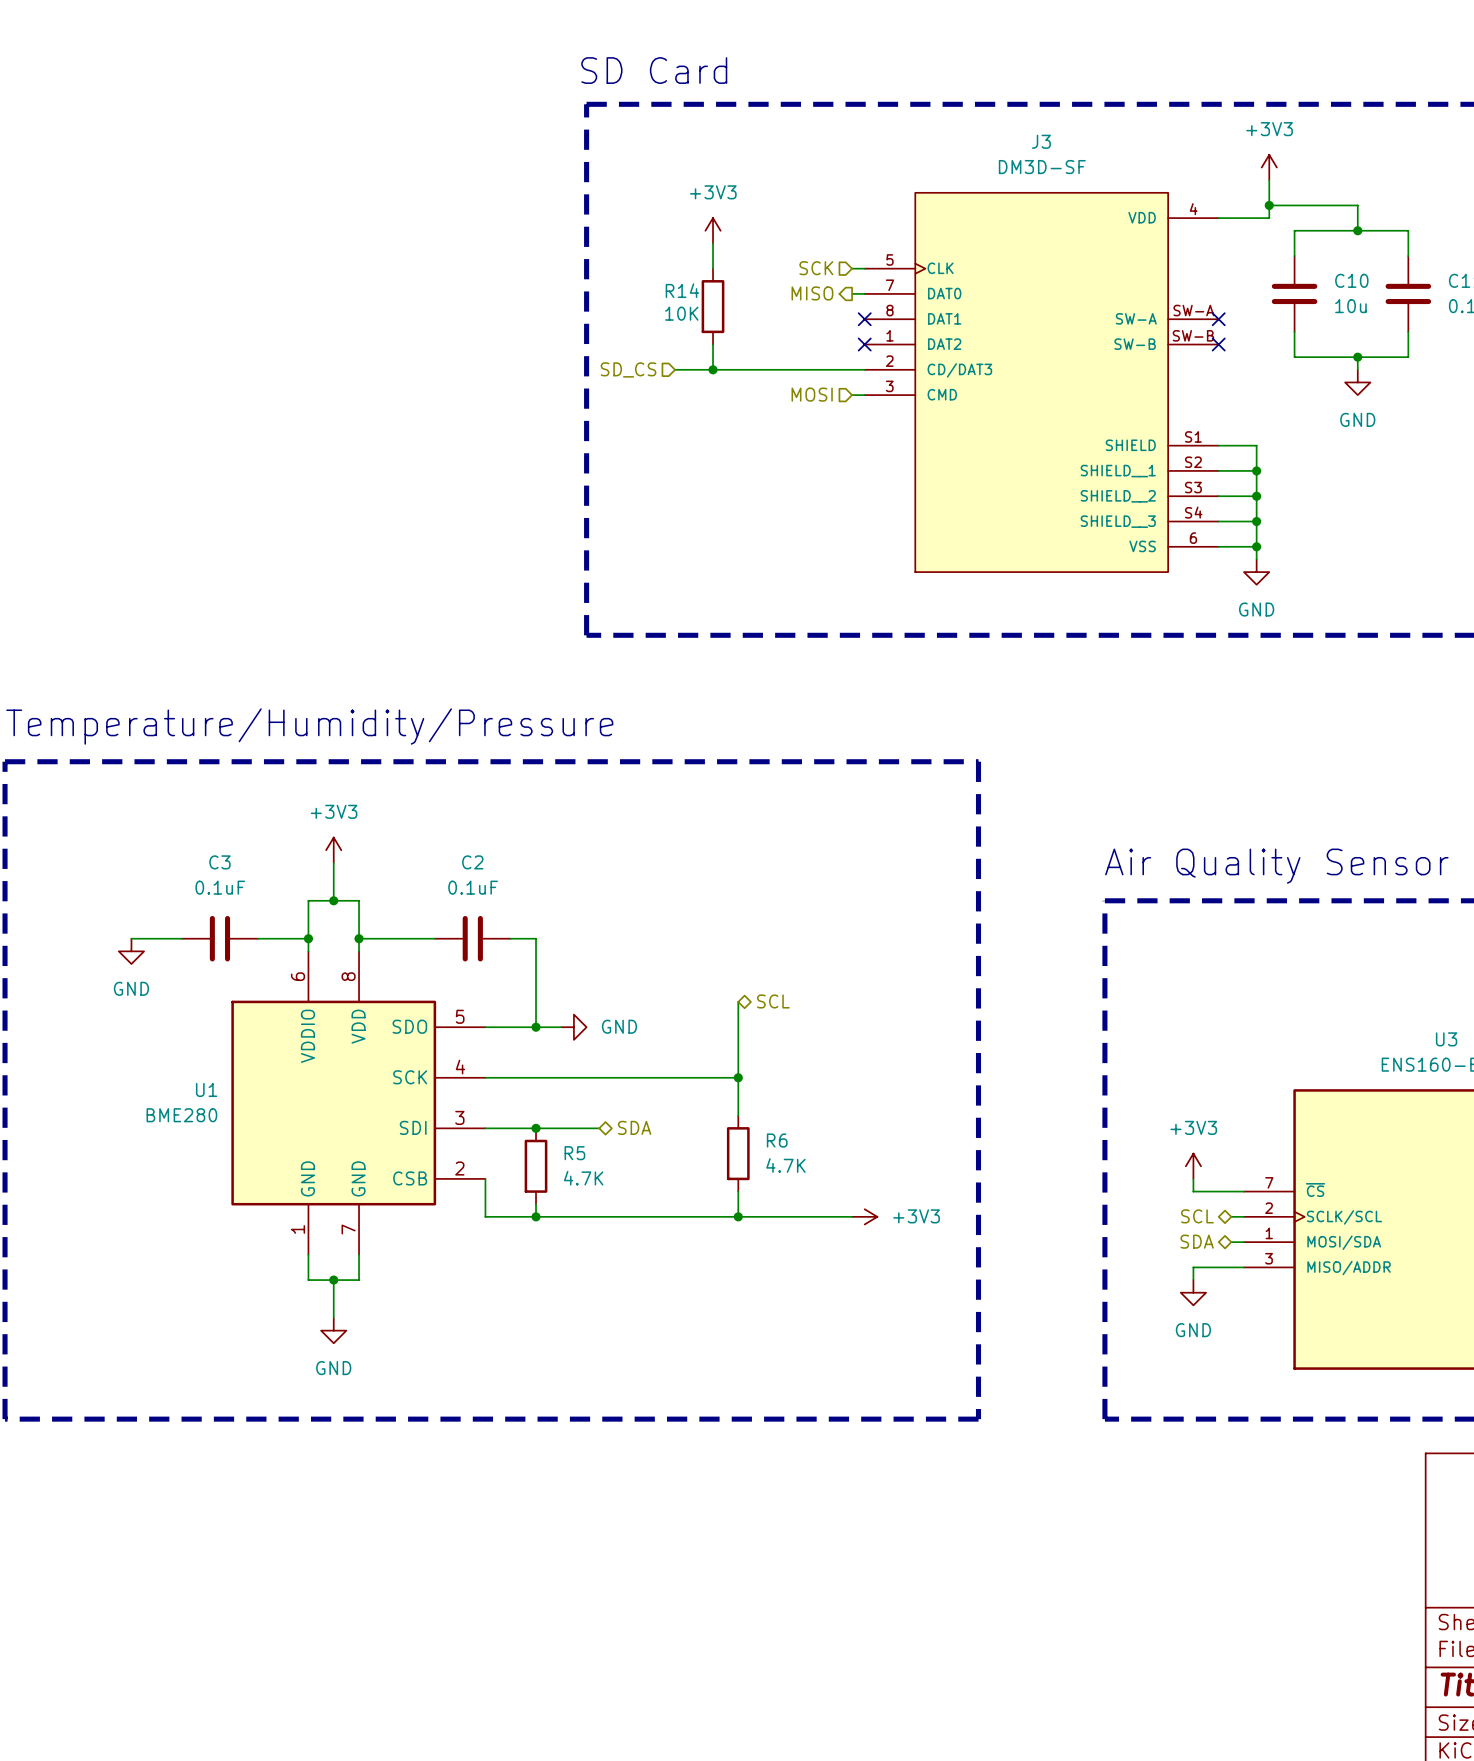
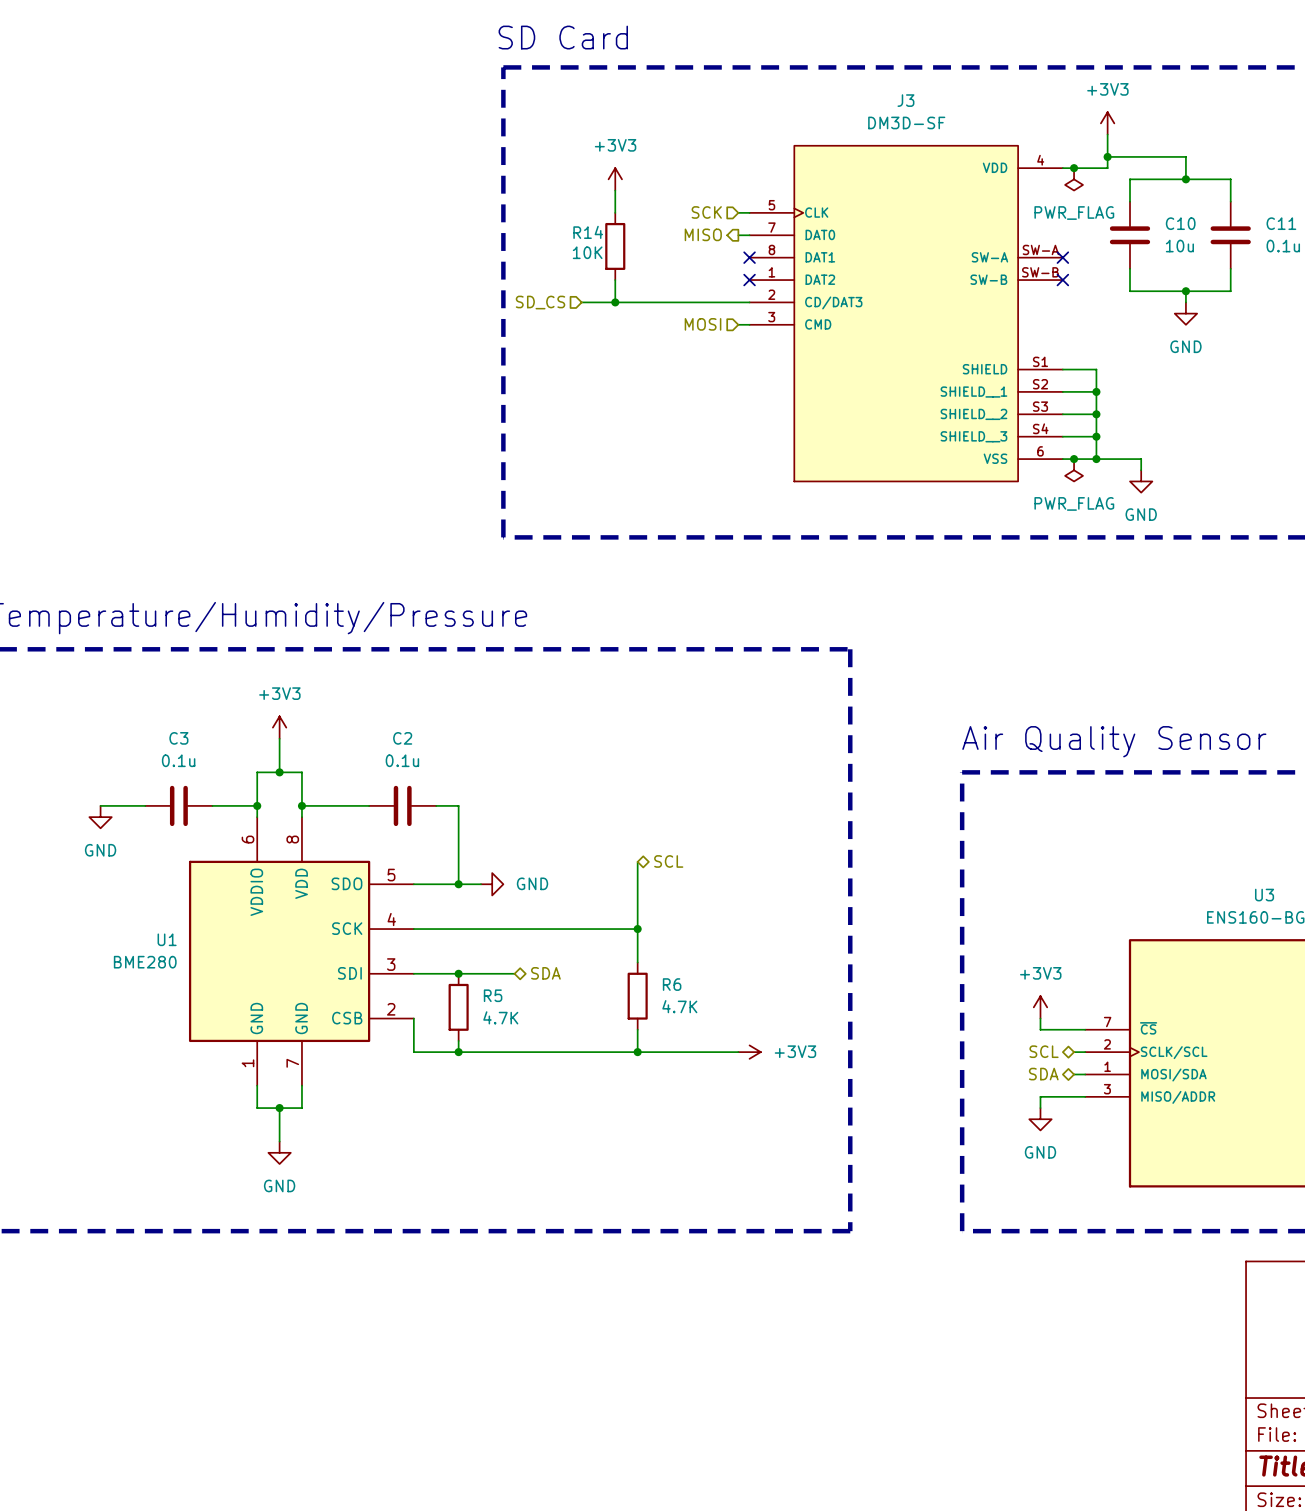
junction: none -> (1074, 168)
power symbol: none -> PWR_FLAG (1074, 179)
junction: none -> (1074, 459)
wire: (1256, 546) (1256, 559) -> (1096, 459) (1141, 459) (1141, 470)
power symbol: none -> PWR_FLAG (1074, 470)
power symbol position: GND (1256, 572) -> GND (1141, 481)
C3 value: 0.1uF (220, 887) -> 0.1u (178, 760)
C2 value: 0.1uF (473, 887) -> 0.1u (402, 760)

